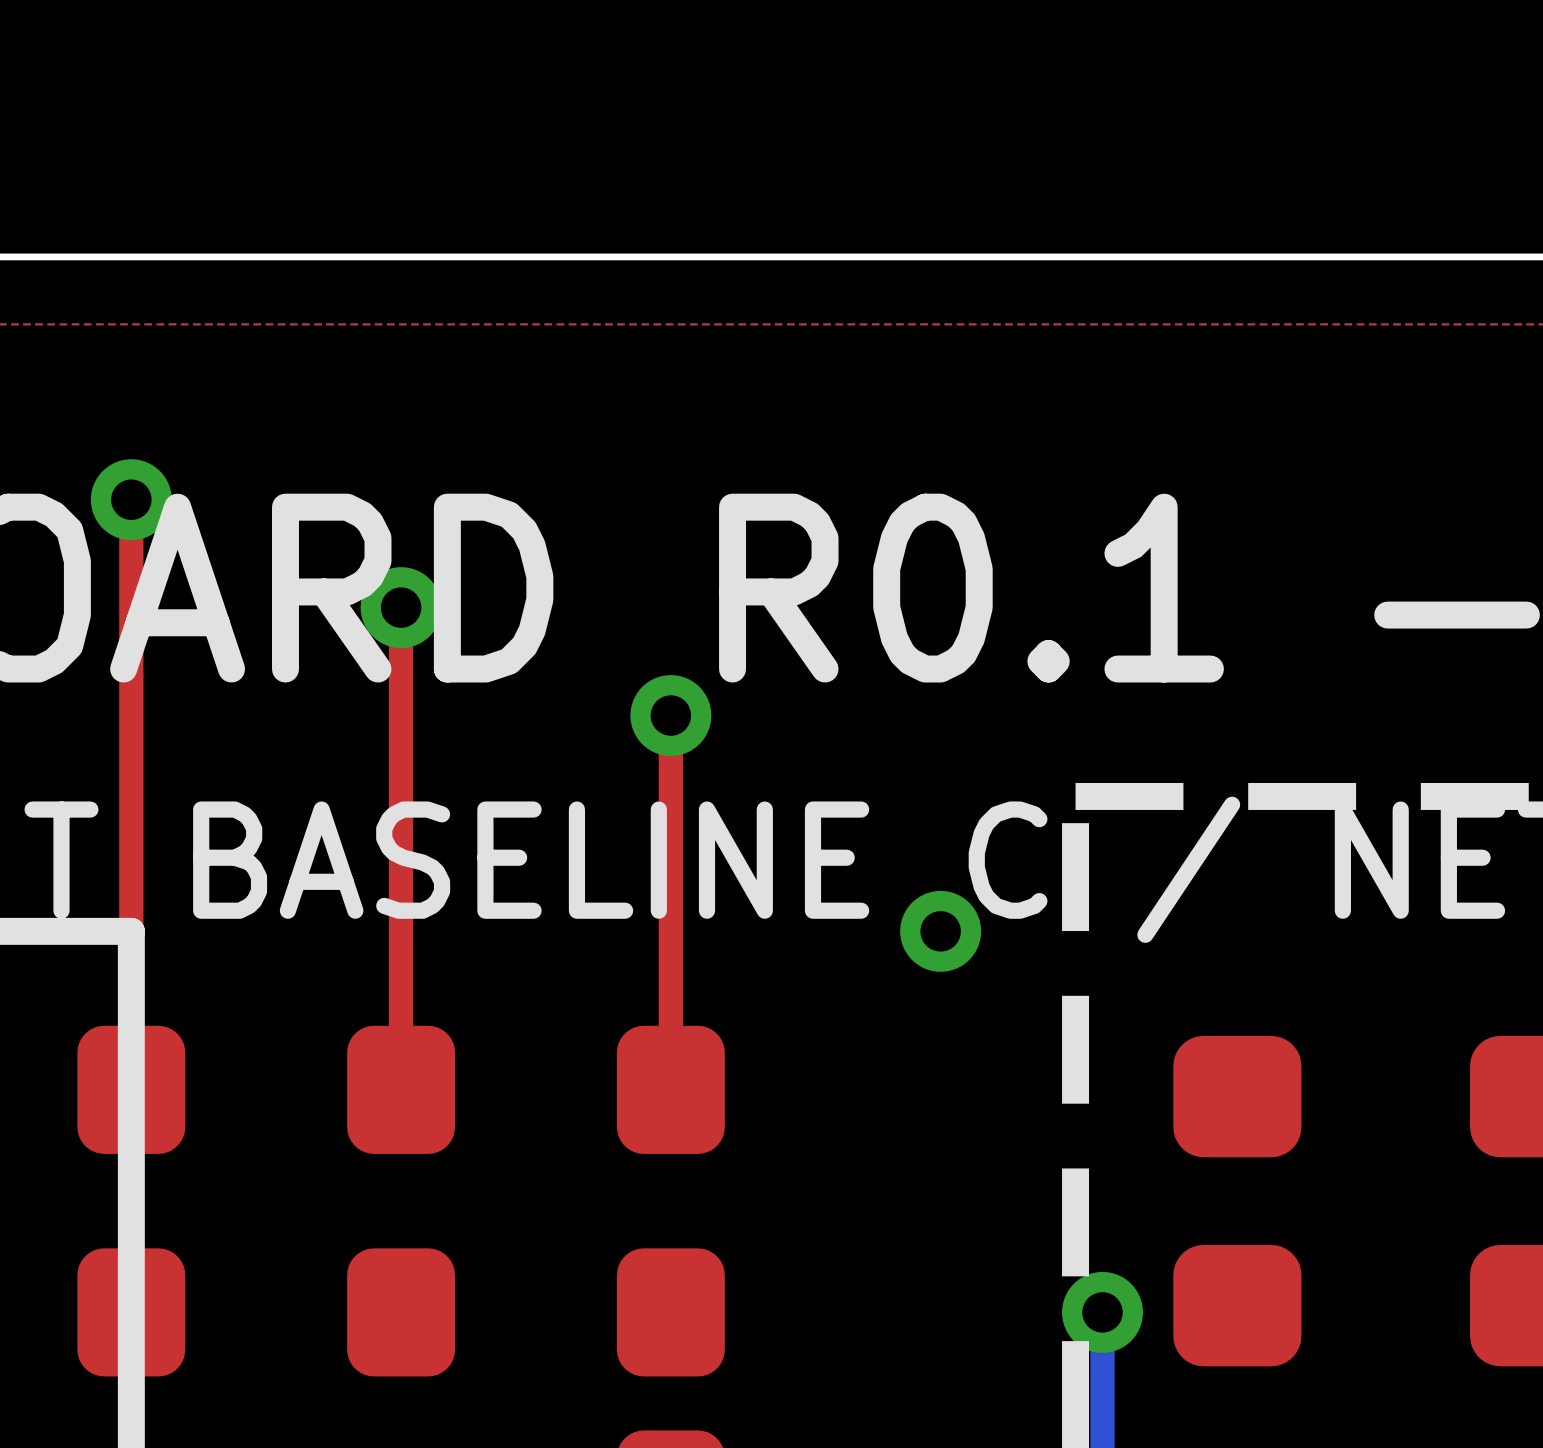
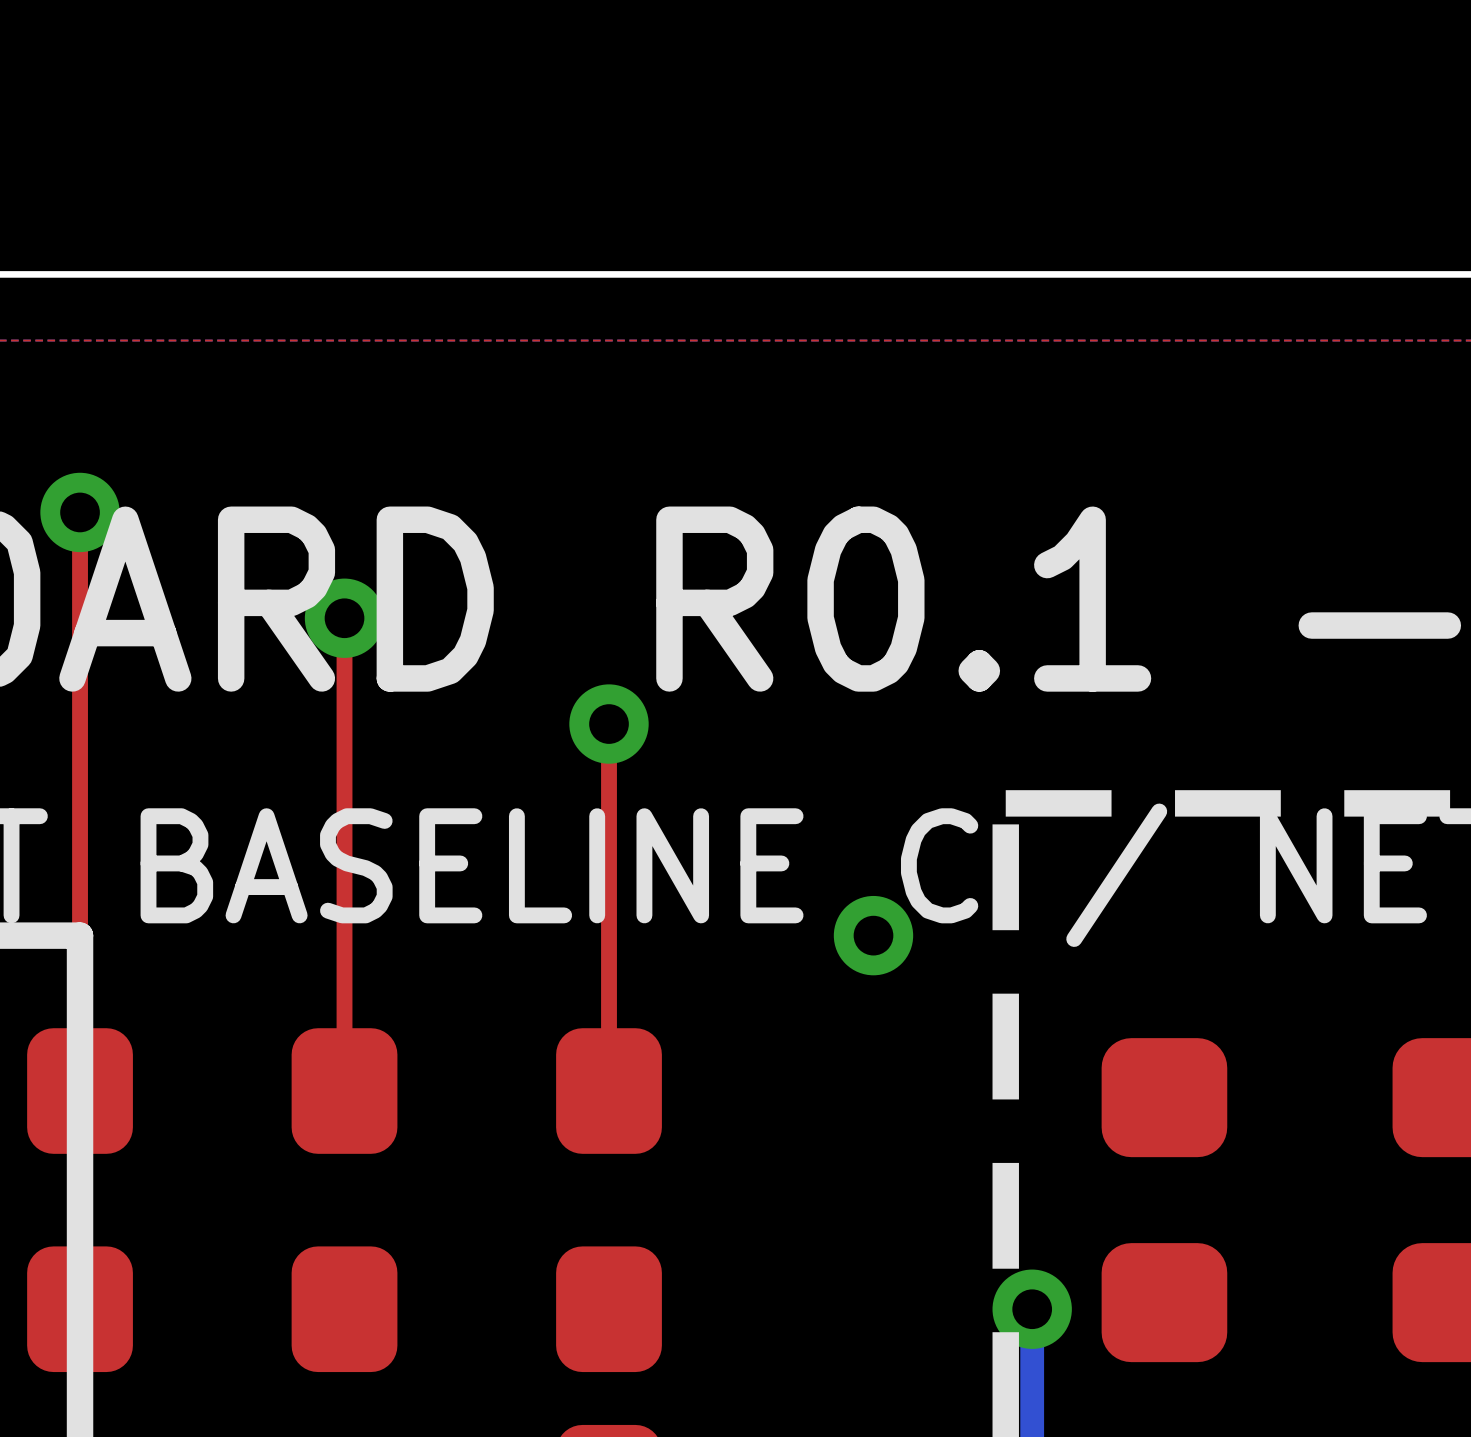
top track width: thick (131, 499) (131, 1089) -> thin (80, 512) (80, 1091)
top track width: thick (401, 607) (401, 1089) -> thin (344, 618) (344, 1091)
top track width: thick (670, 715) (670, 1089) -> thin (609, 724) (609, 1091)

